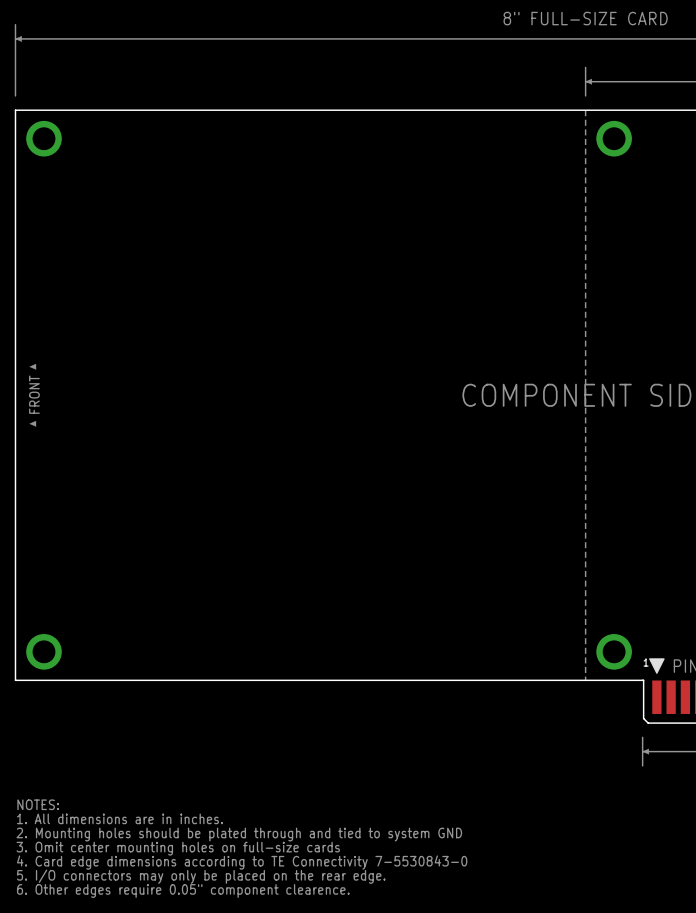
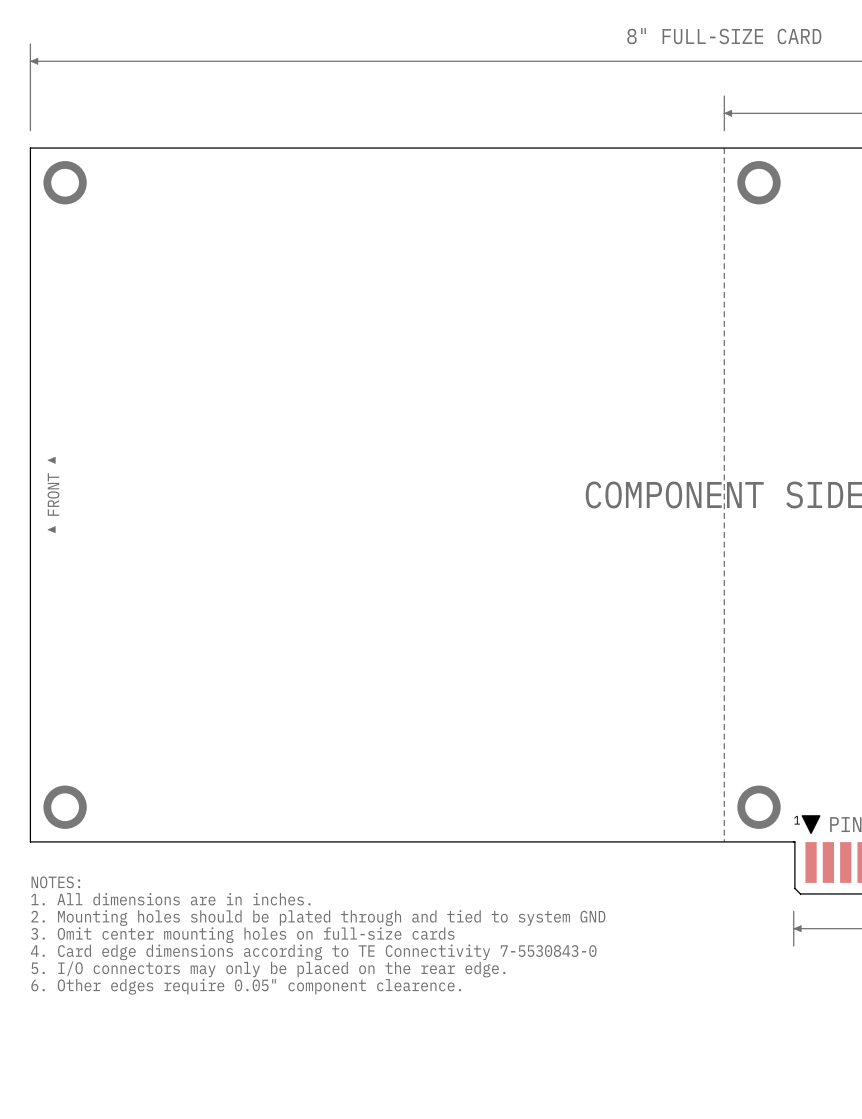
text position: NOTES: (38, 804) -> NOTES: (55, 882)
text position: 1. All dimensions are in inches. (120, 818) -> 1. All dimensions are in inches. (170, 899)
text position: 2. Mounting holes should be plated through and tied to system GND (239, 834) -> 2. Mounting holes should be plated through and tied to system GND (318, 918)
text position: 3. Omit center mounting holes on full-size cards (178, 848) -> 3. Omit center mounting holes on full-size cards (242, 935)
text position: 4. Card edge dimensions according to TE Connectivity 7-5530843-0 (242, 862) -> 4. Card edge dimensions according to TE Connectivity 7-5530843-0 (313, 952)
text position: 5. I/O connectors may only be placed on the rear edge. (201, 876) -> 5. I/O connectors may only be placed on the rear edge. (268, 969)
text position: 6. Other edges require 0.05" component clearence. (183, 891) -> 6. Other edges require 0.05" component clearence. (246, 986)

